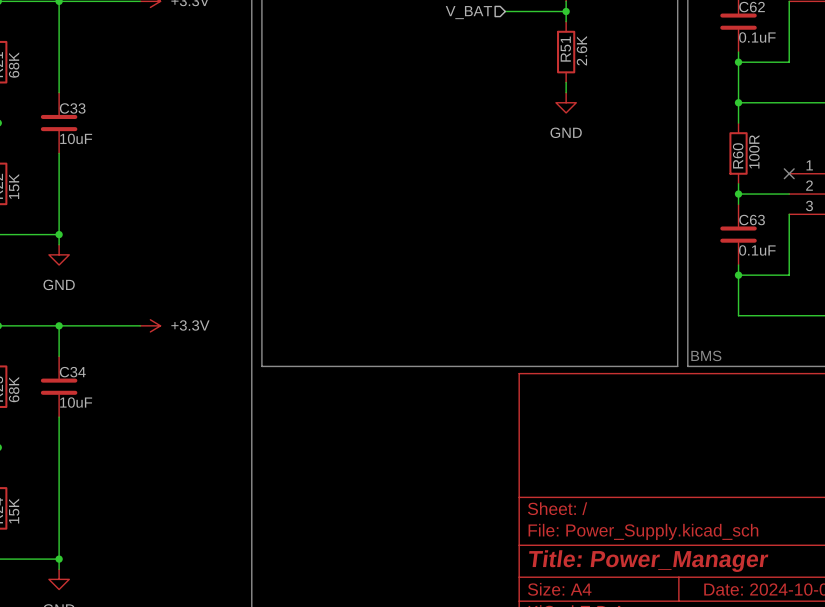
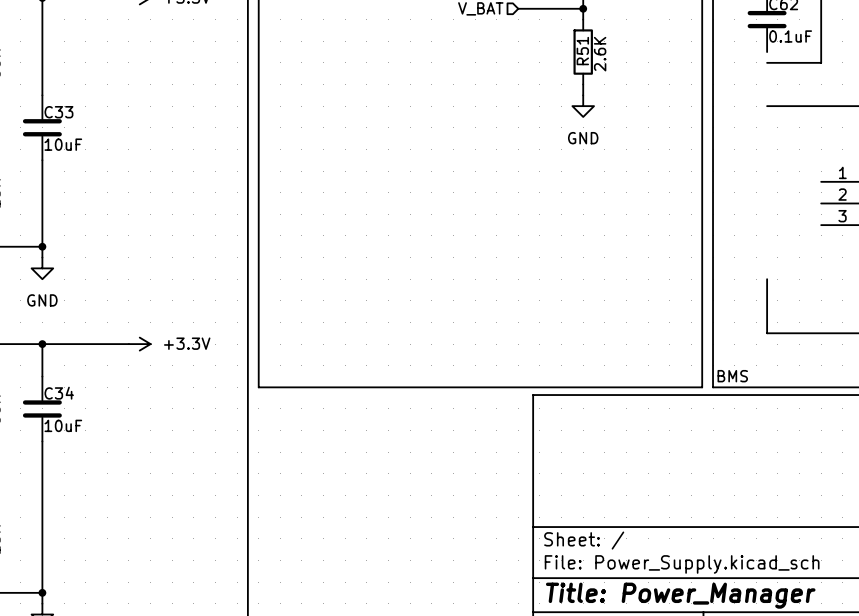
wire: (738, 52) (738, 123) -> none
junction: (738, 62) -> none
junction: (738, 102) -> none
R60: 100R (738, 153) -> none
no-connect mark: (789, 173) -> none
wire: (738, 183) (738, 204) -> none
wire: (738, 194) (789, 194) -> none
junction: (738, 194) -> none
wire: (789, 214) (789, 275) (738, 275) -> none
C63: 0.1uF (738, 234) -> none
junction: (738, 275) -> none

